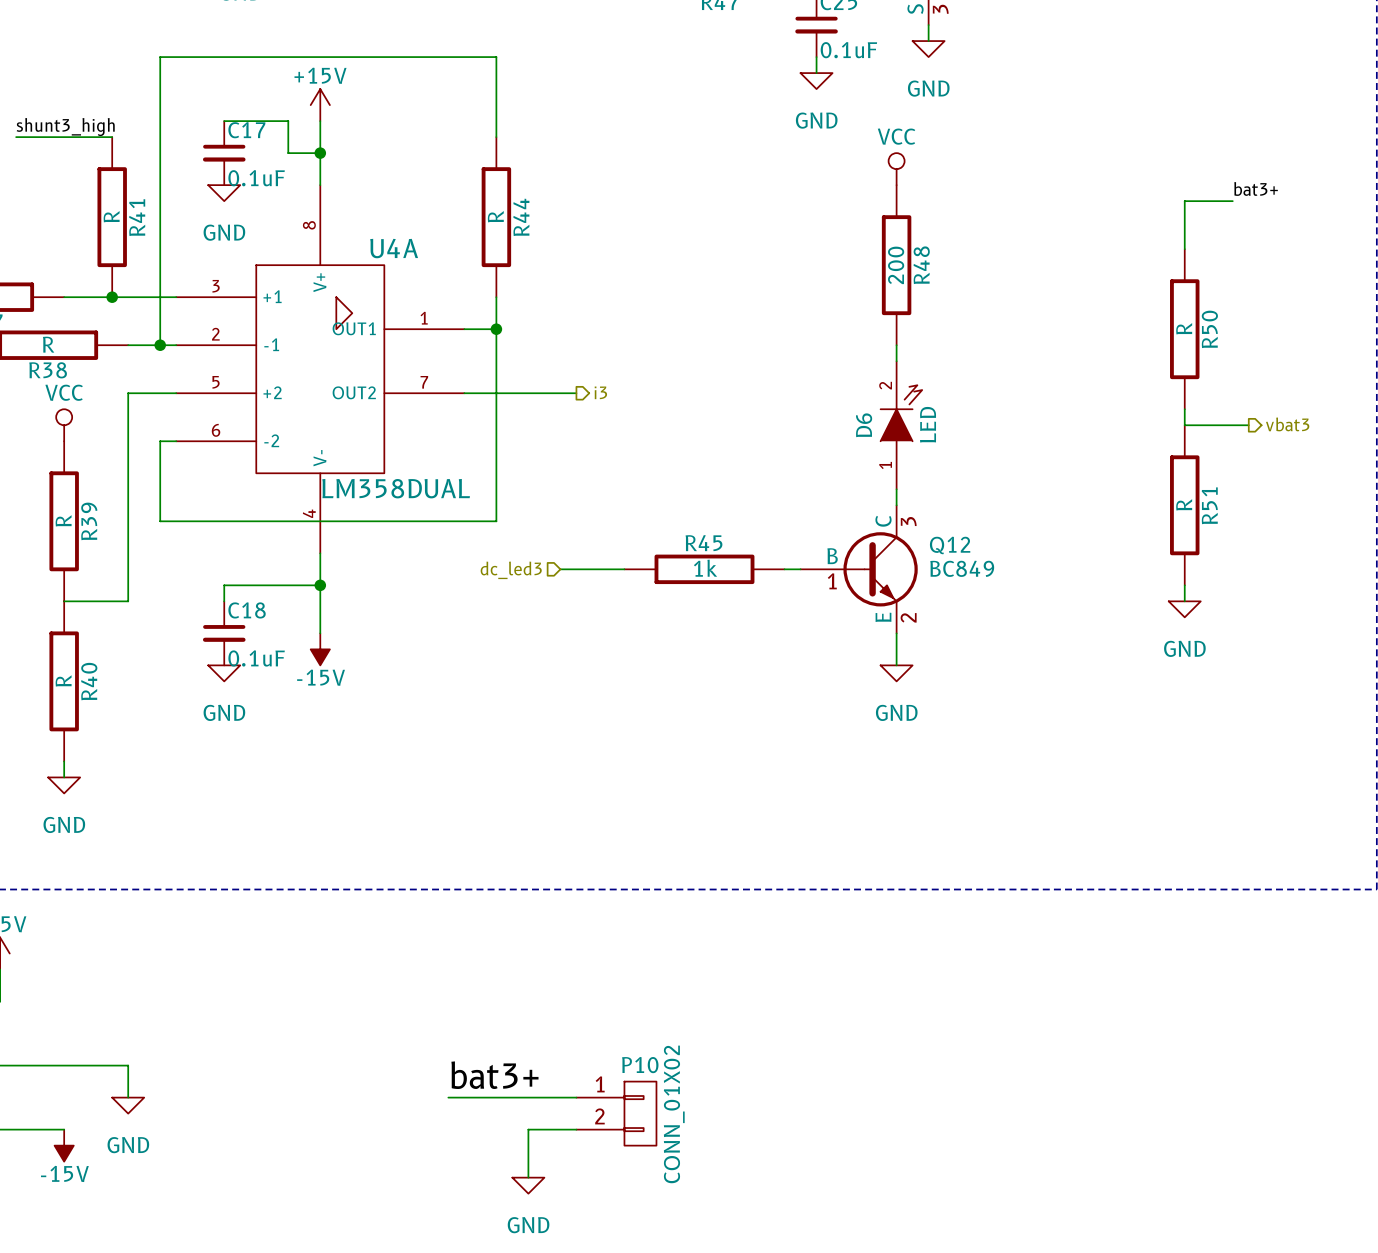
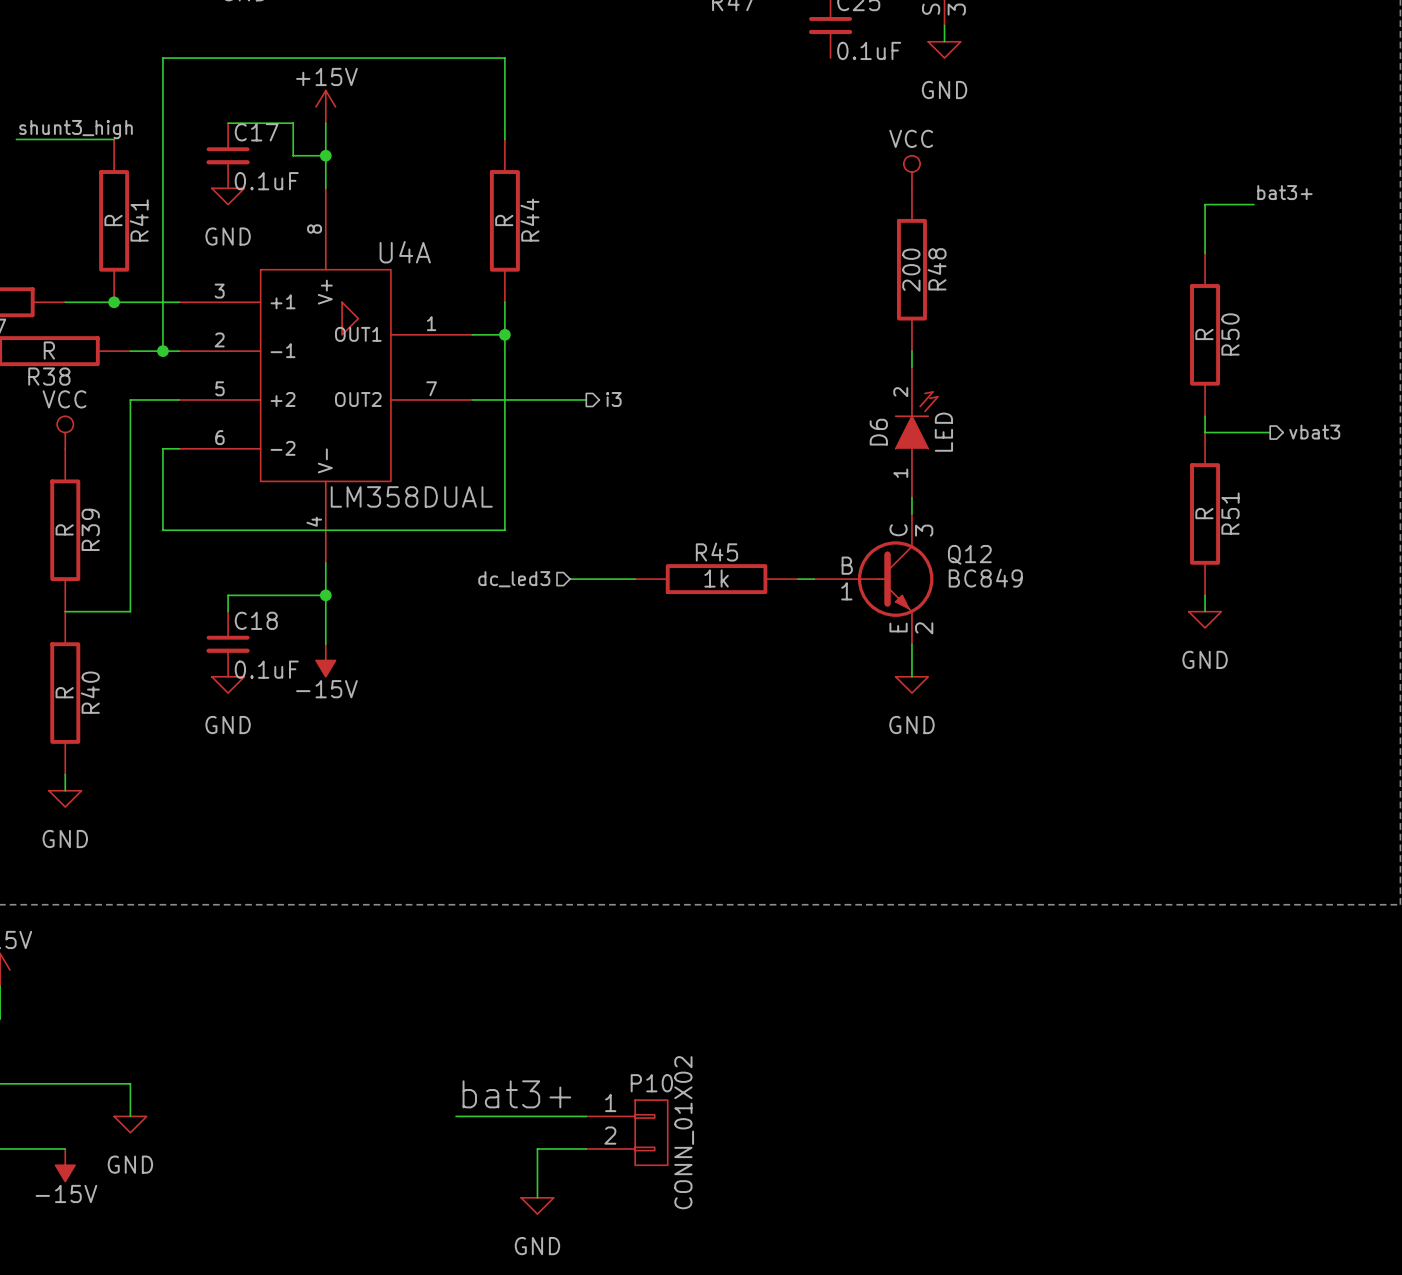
wire: (816, 57) (816, 73) -> none
power symbol: GND (816, 81) -> none

